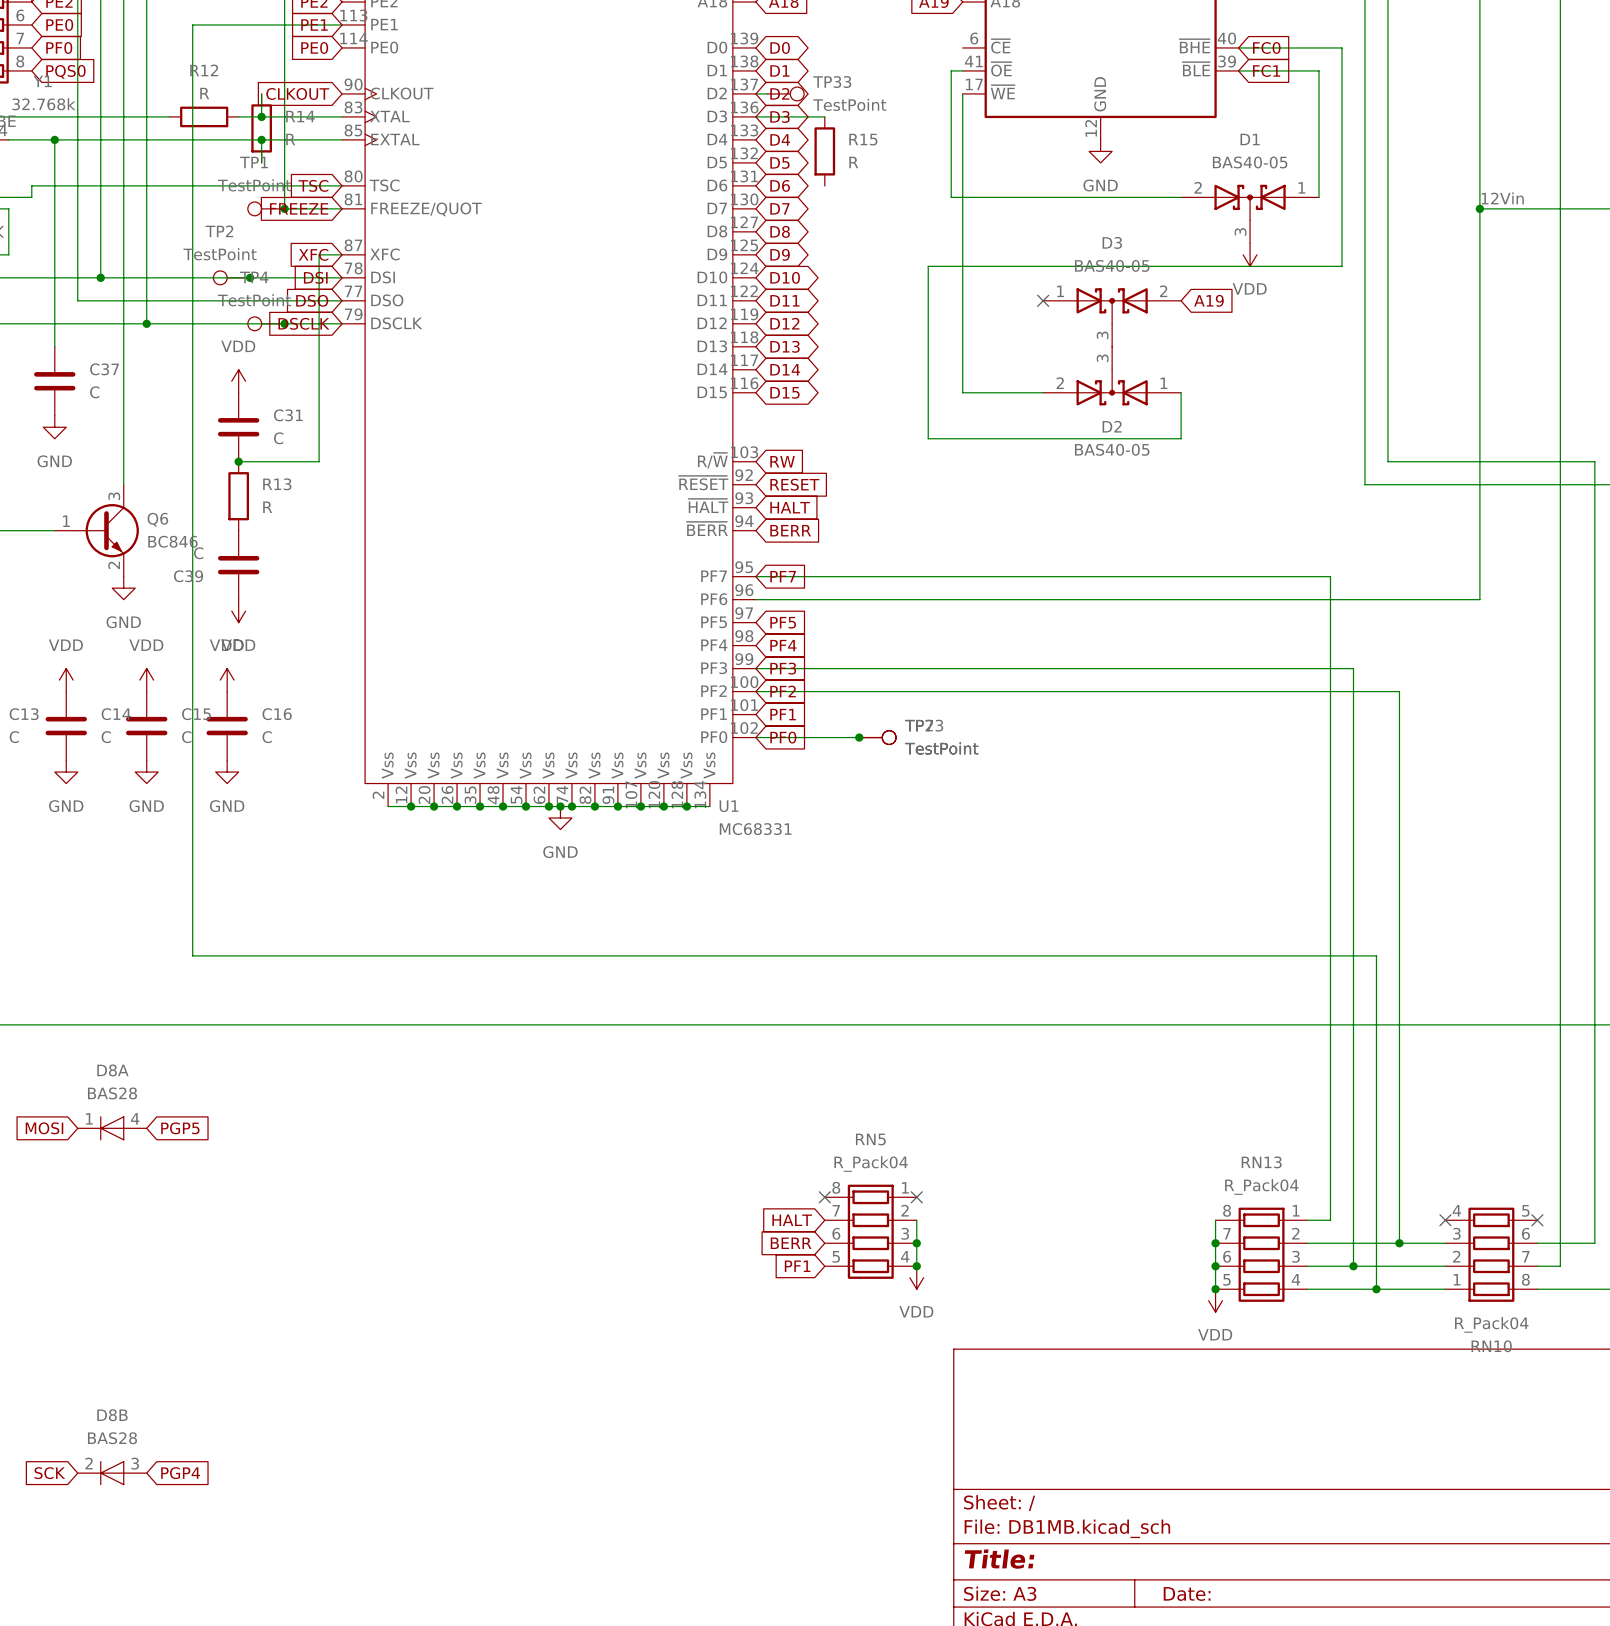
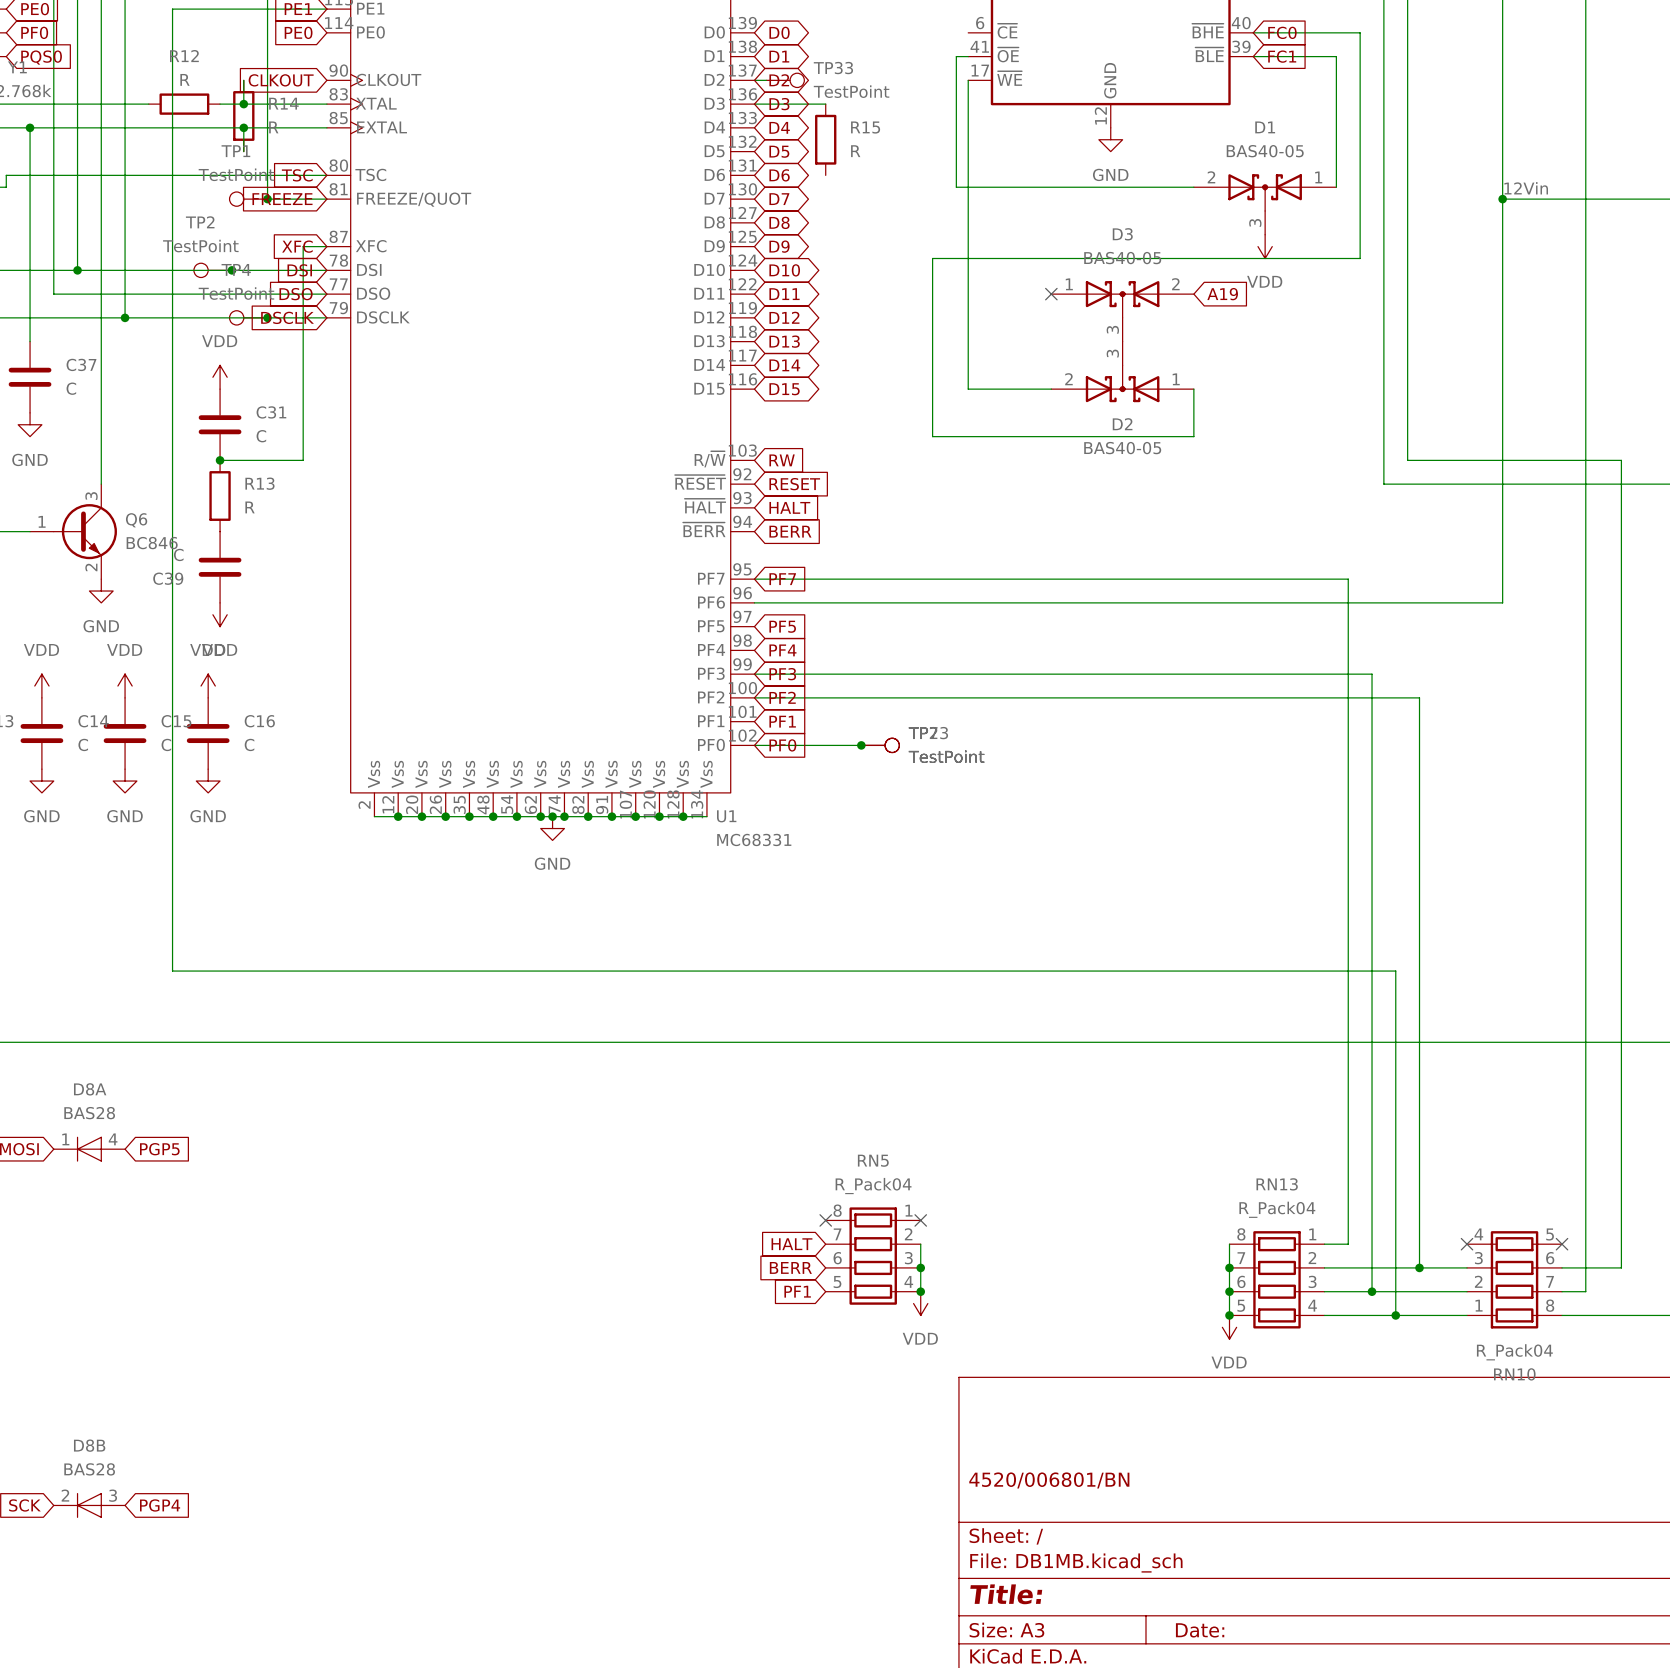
title block: none -> 4520/006801/BN (1049, 1480)

